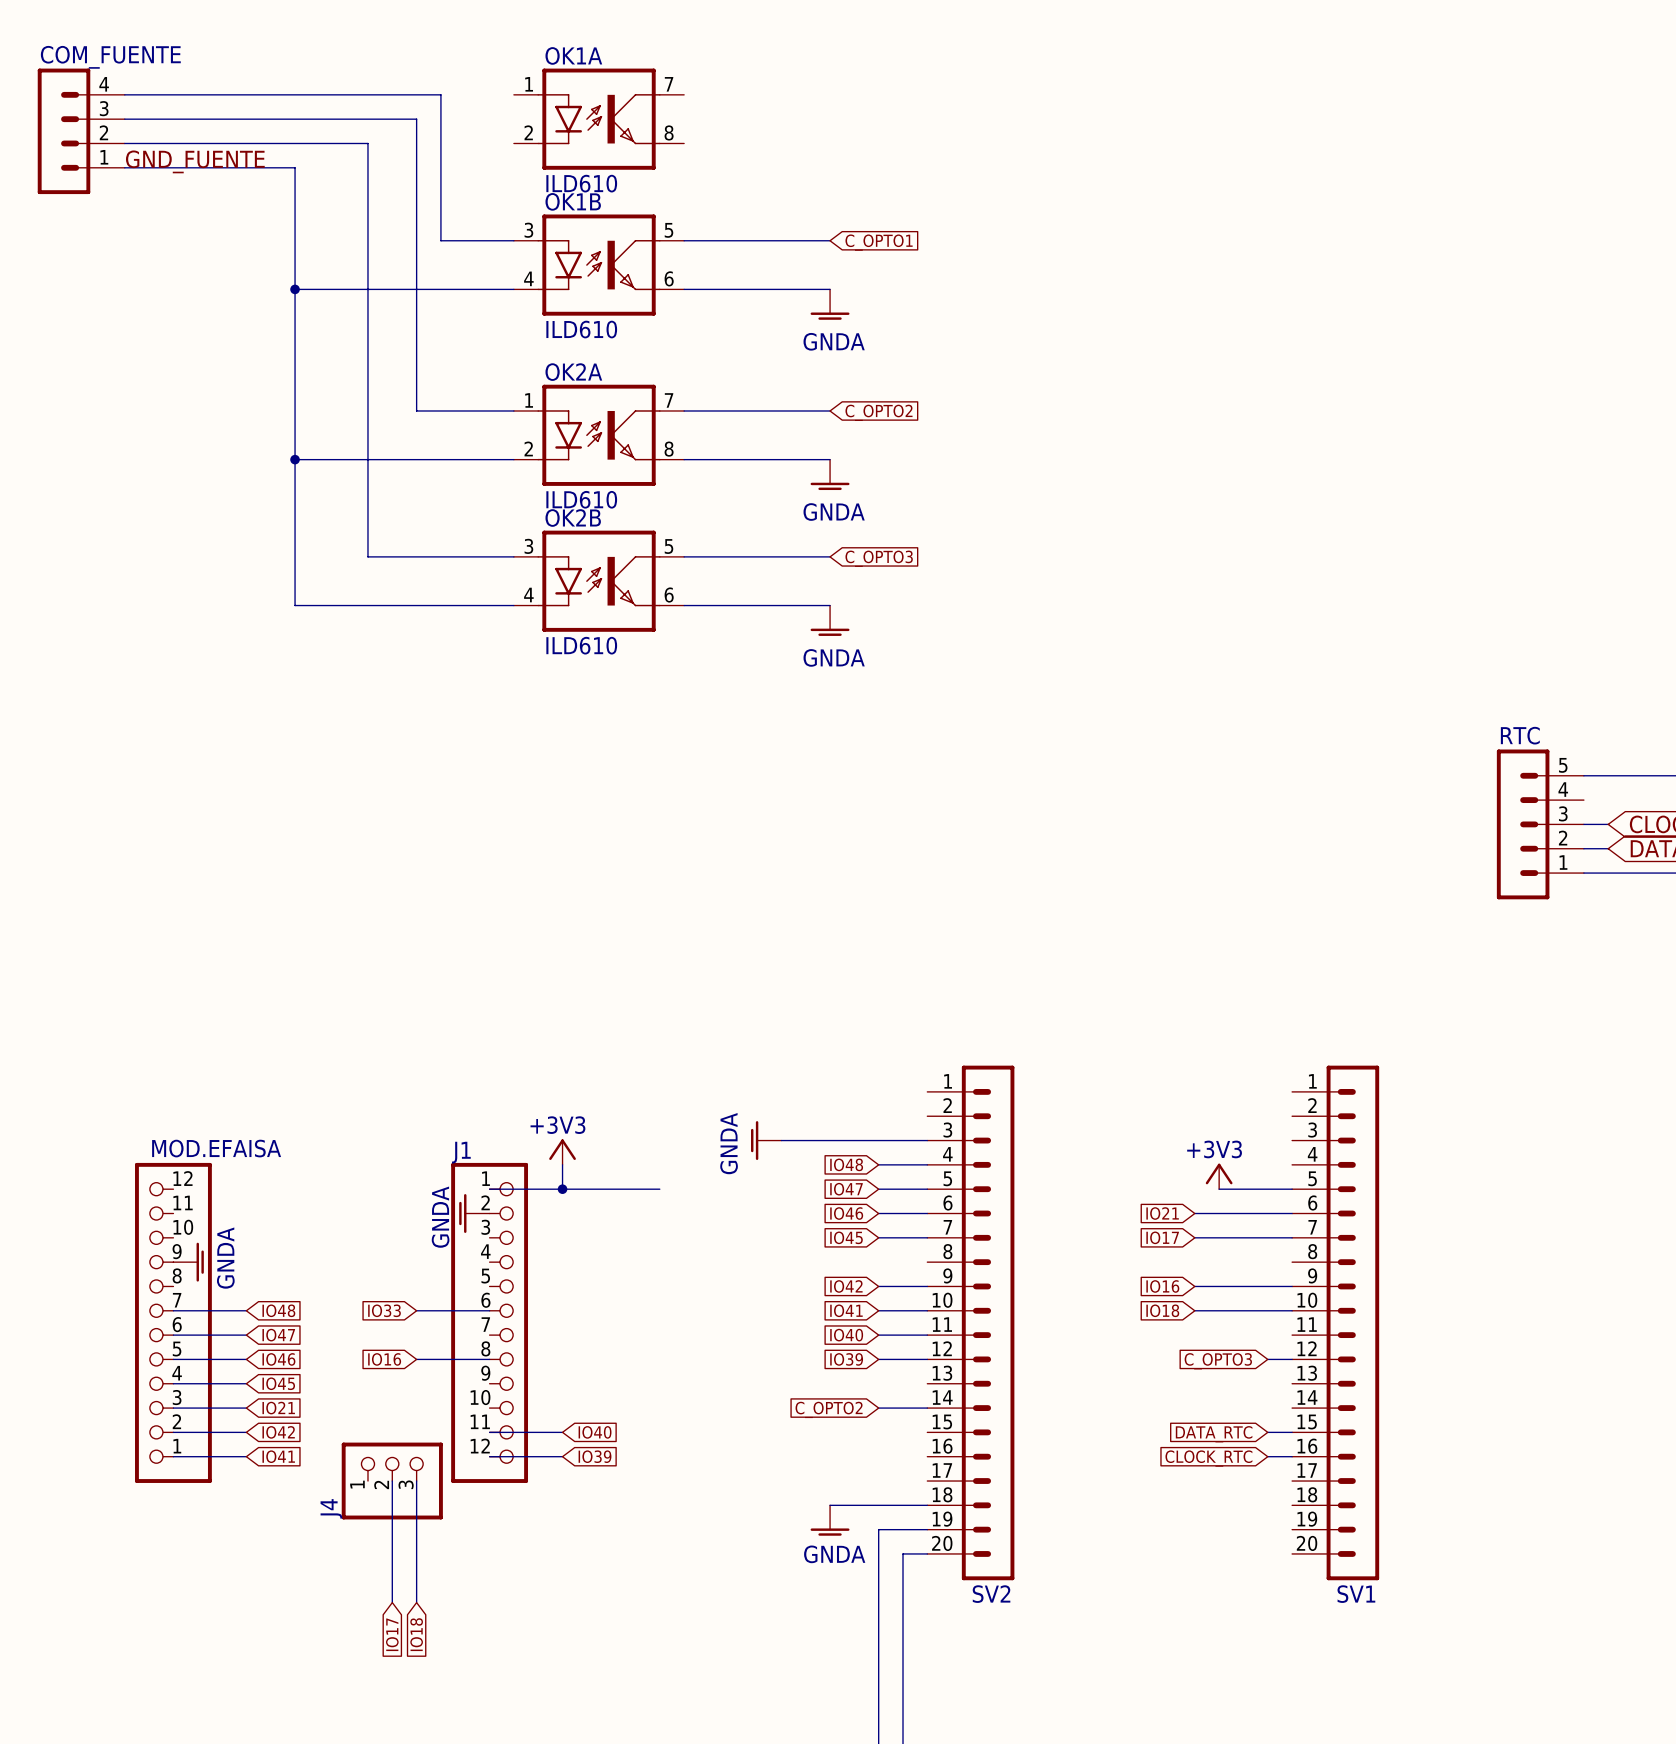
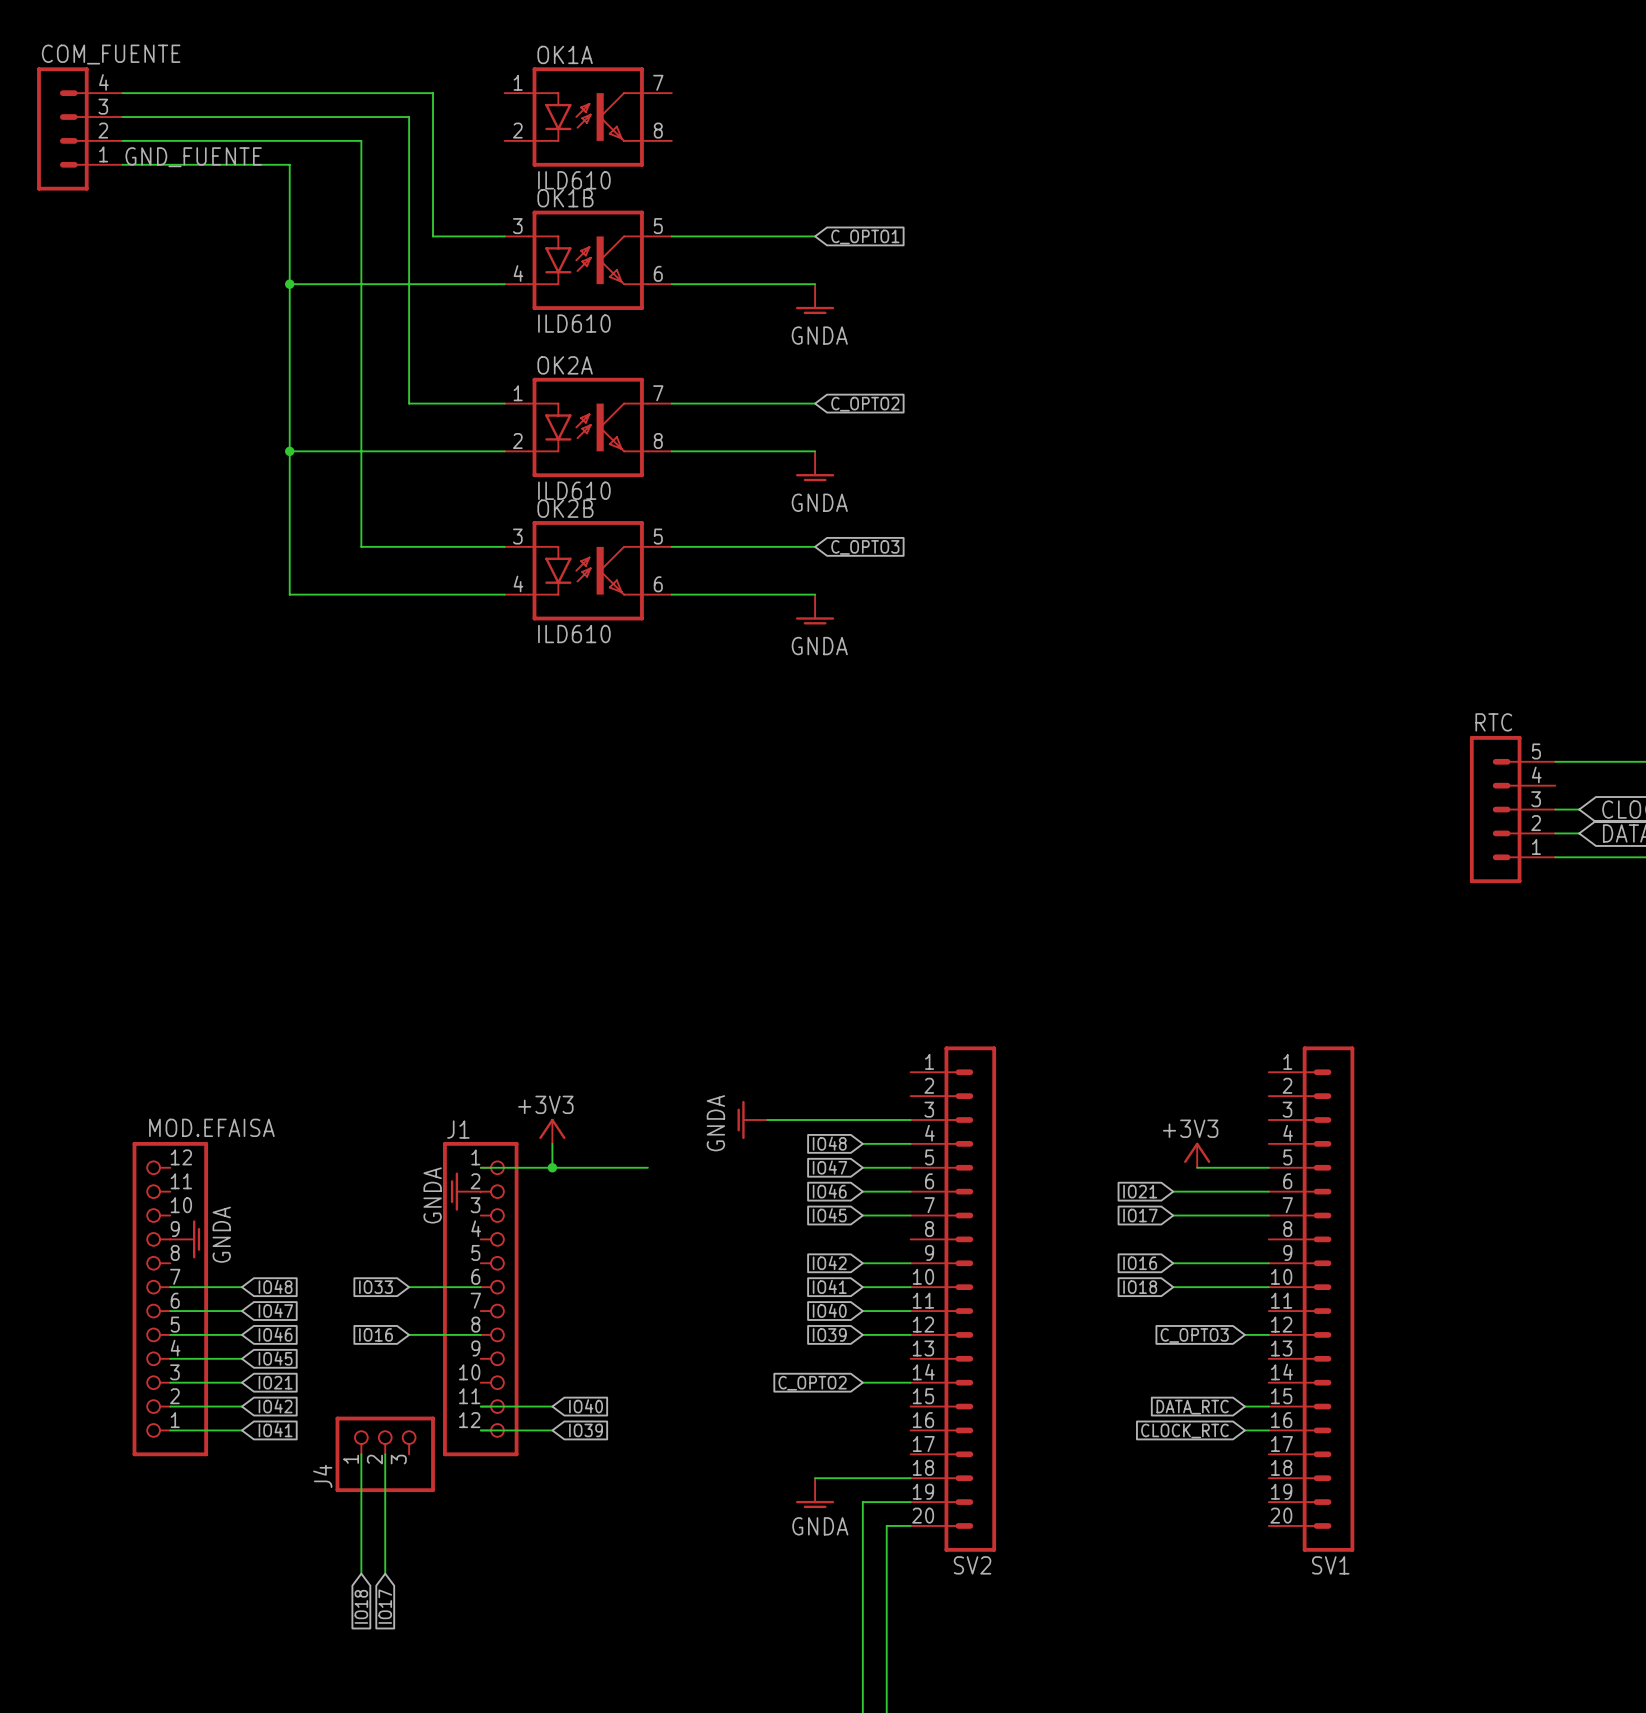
wire: (416, 1481) (416, 1602) -> (361, 1454) (361, 1573)
global label position: IO18 (416, 1634) -> IO18 (361, 1606)

